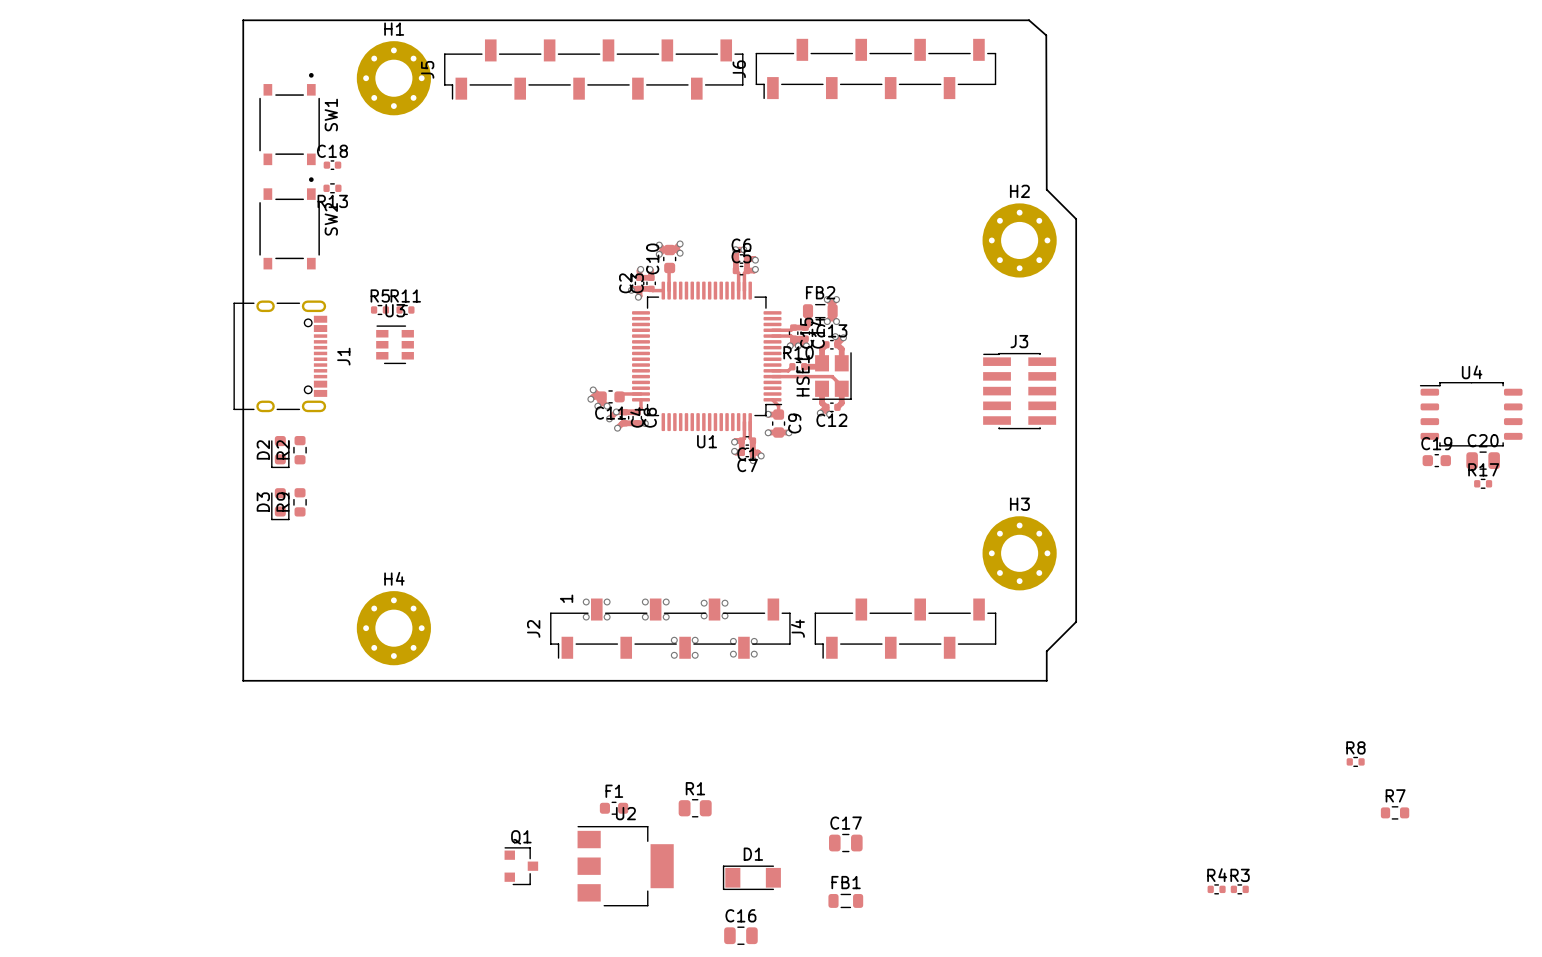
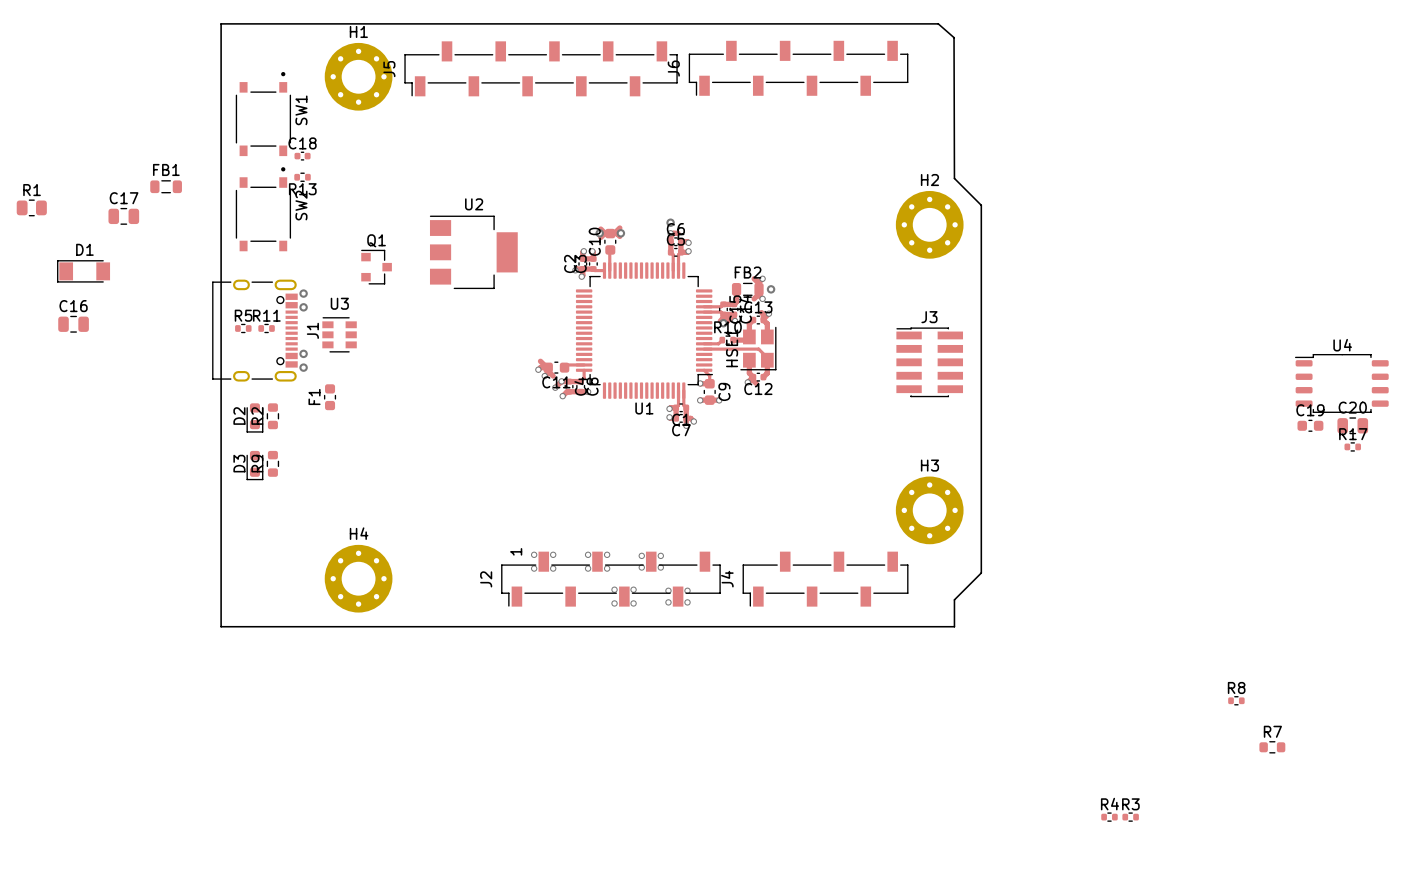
via: none -> (670, 222)
via: (680, 243) -> none
via: (659, 245) -> none
via: none -> (599, 233)
via: none -> (620, 233)
via: (743, 249) -> none
via: (680, 253) -> none
via: (659, 254) -> none
via: (827, 299) -> none
R5 position: (379, 309) -> (243, 328)
R11 position: (405, 309) -> (266, 328)
via: none -> (771, 289)
via: none -> (303, 293)
via: (827, 321) -> none
via: none -> (303, 307)
via: (835, 336) -> none
U3 position: (395, 344) -> (339, 334)
via: (790, 345) -> none
via: (798, 345) -> none
via: none -> (723, 323)
via: none -> (303, 353)
via: (593, 389) -> none
via: none -> (303, 367)
via: (607, 406) -> none
via: (829, 414) -> none
F1 name position: F1 (614, 791) -> F1 (314, 396)
F1 rotation: 0° (614, 808) -> 90° clockwise (330, 397)
F1 position: (614, 808) -> (330, 397)
R1 position: (695, 808) -> (31, 207)
C17 position: (845, 843) -> (123, 216)
Q1 position: (521, 866) -> (376, 267)
U2 position: (625, 866) -> (473, 252)
D1 position: (751, 877) -> (83, 271)
FB1 position: (845, 900) -> (166, 186)
C16 position: (740, 935) -> (73, 324)

